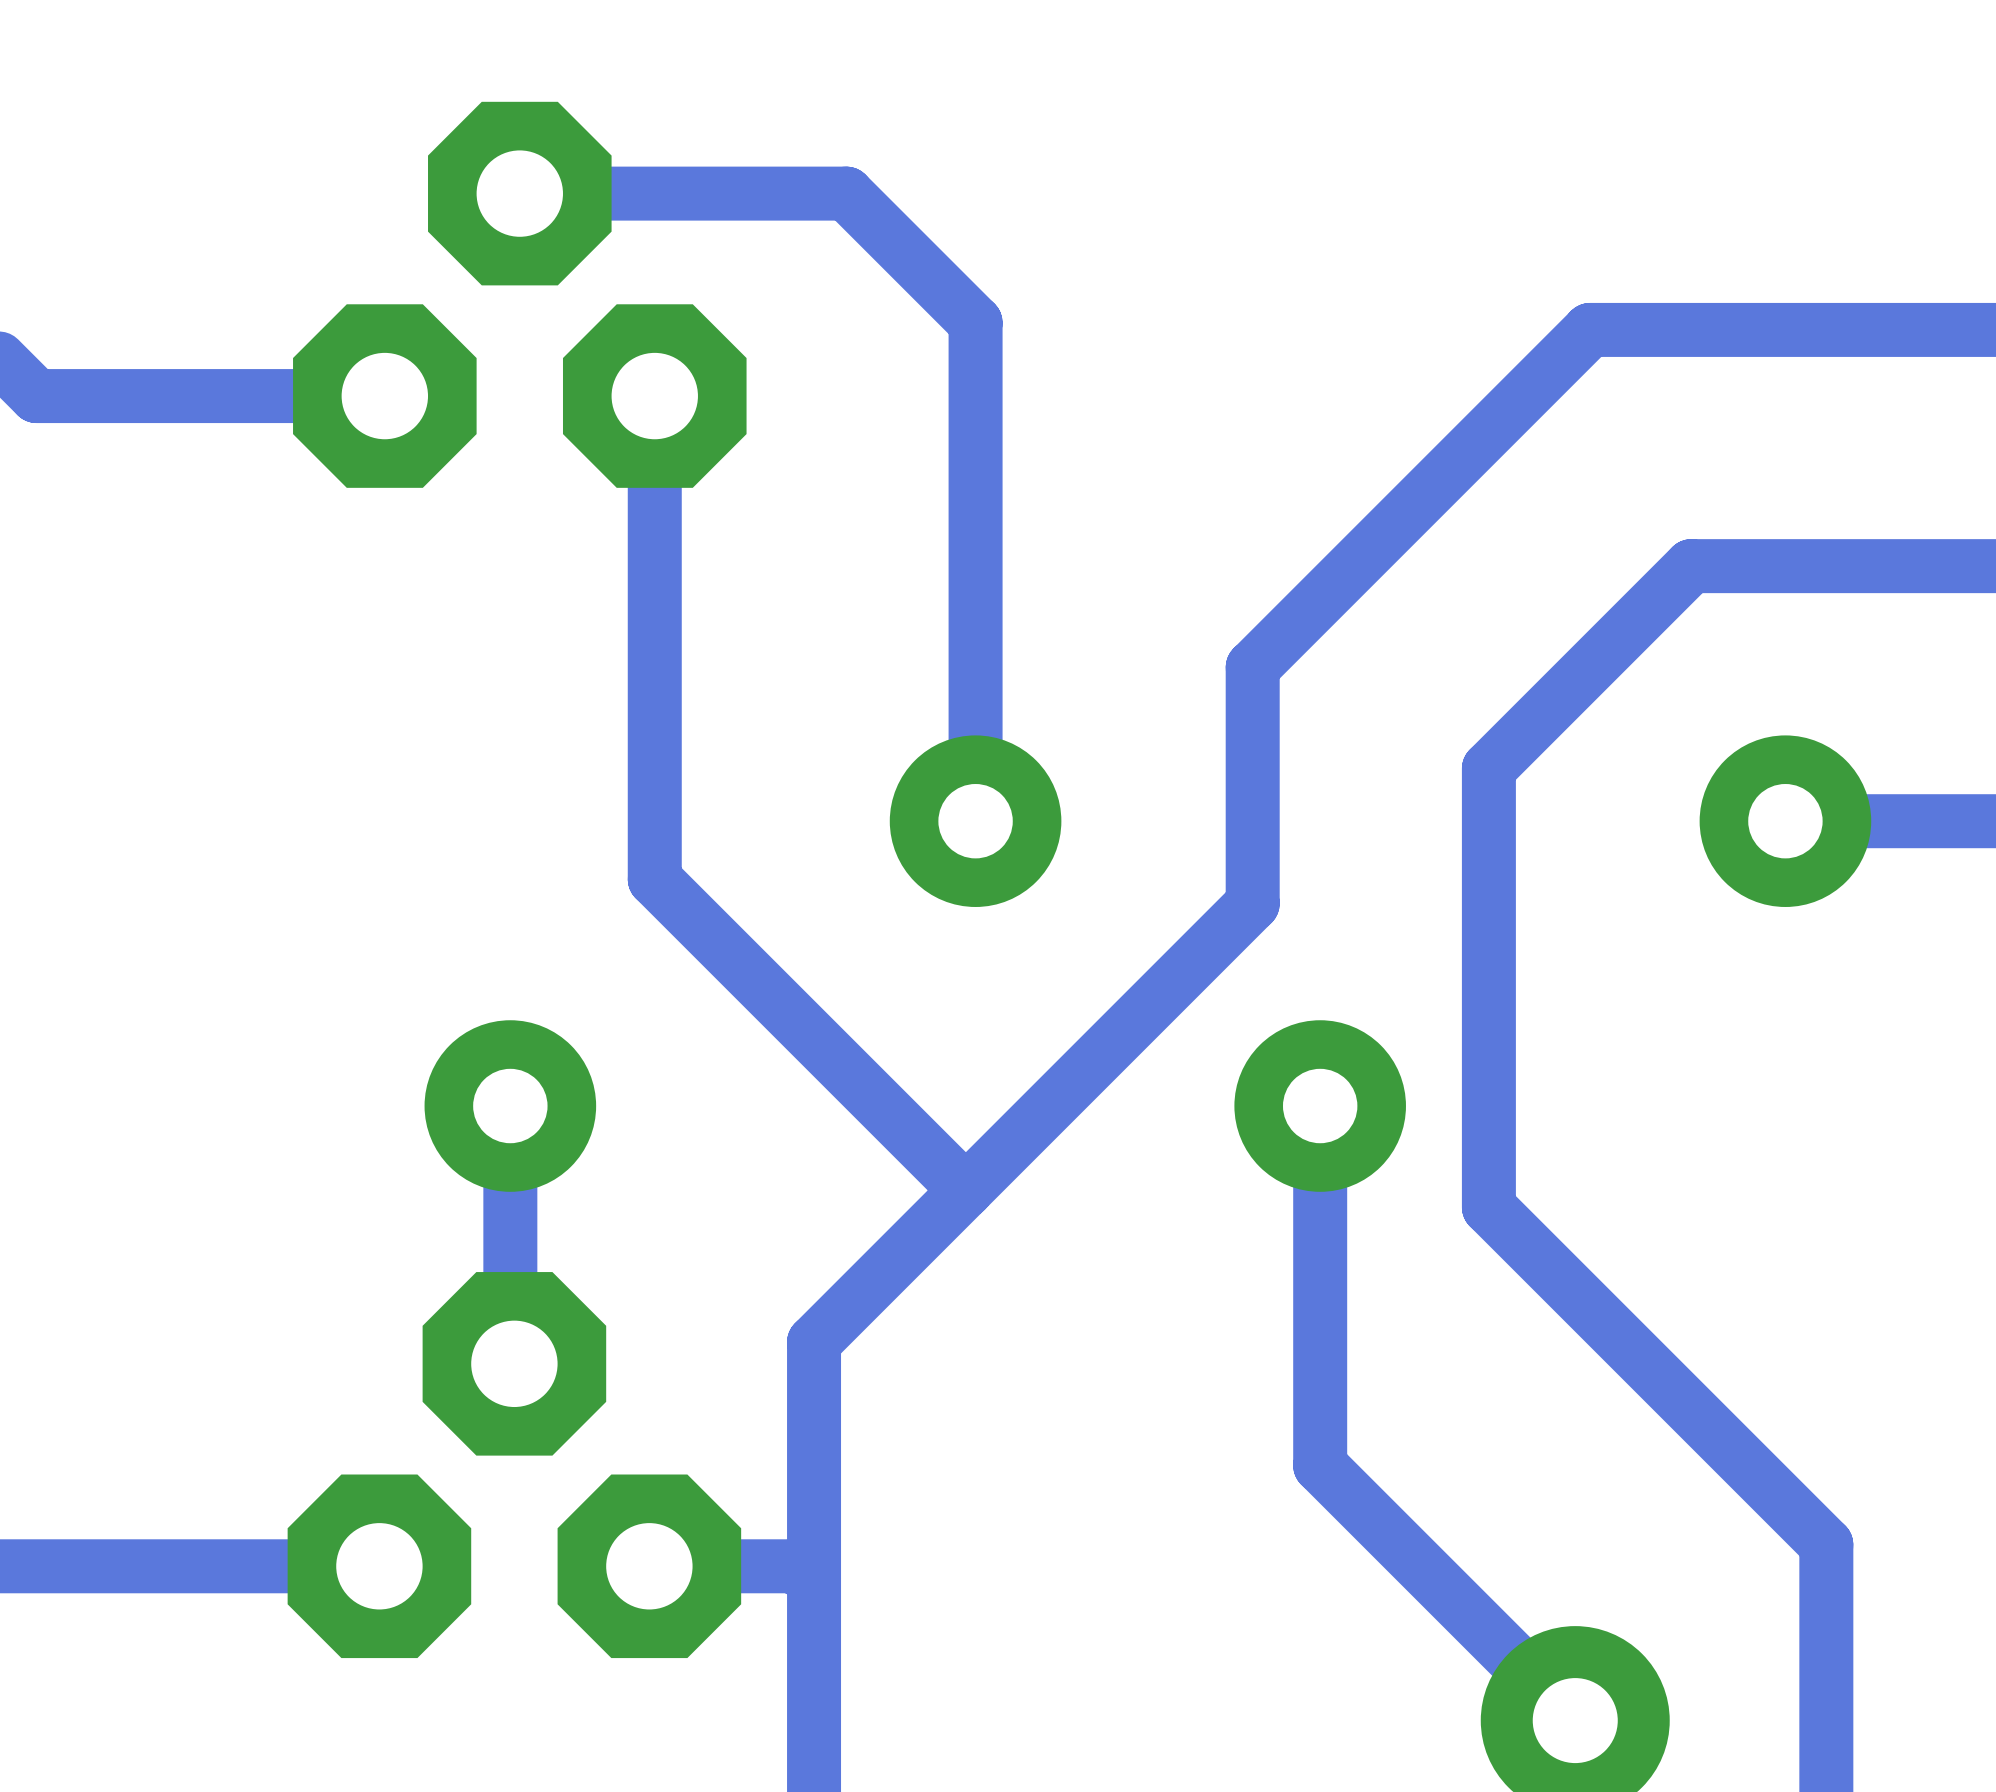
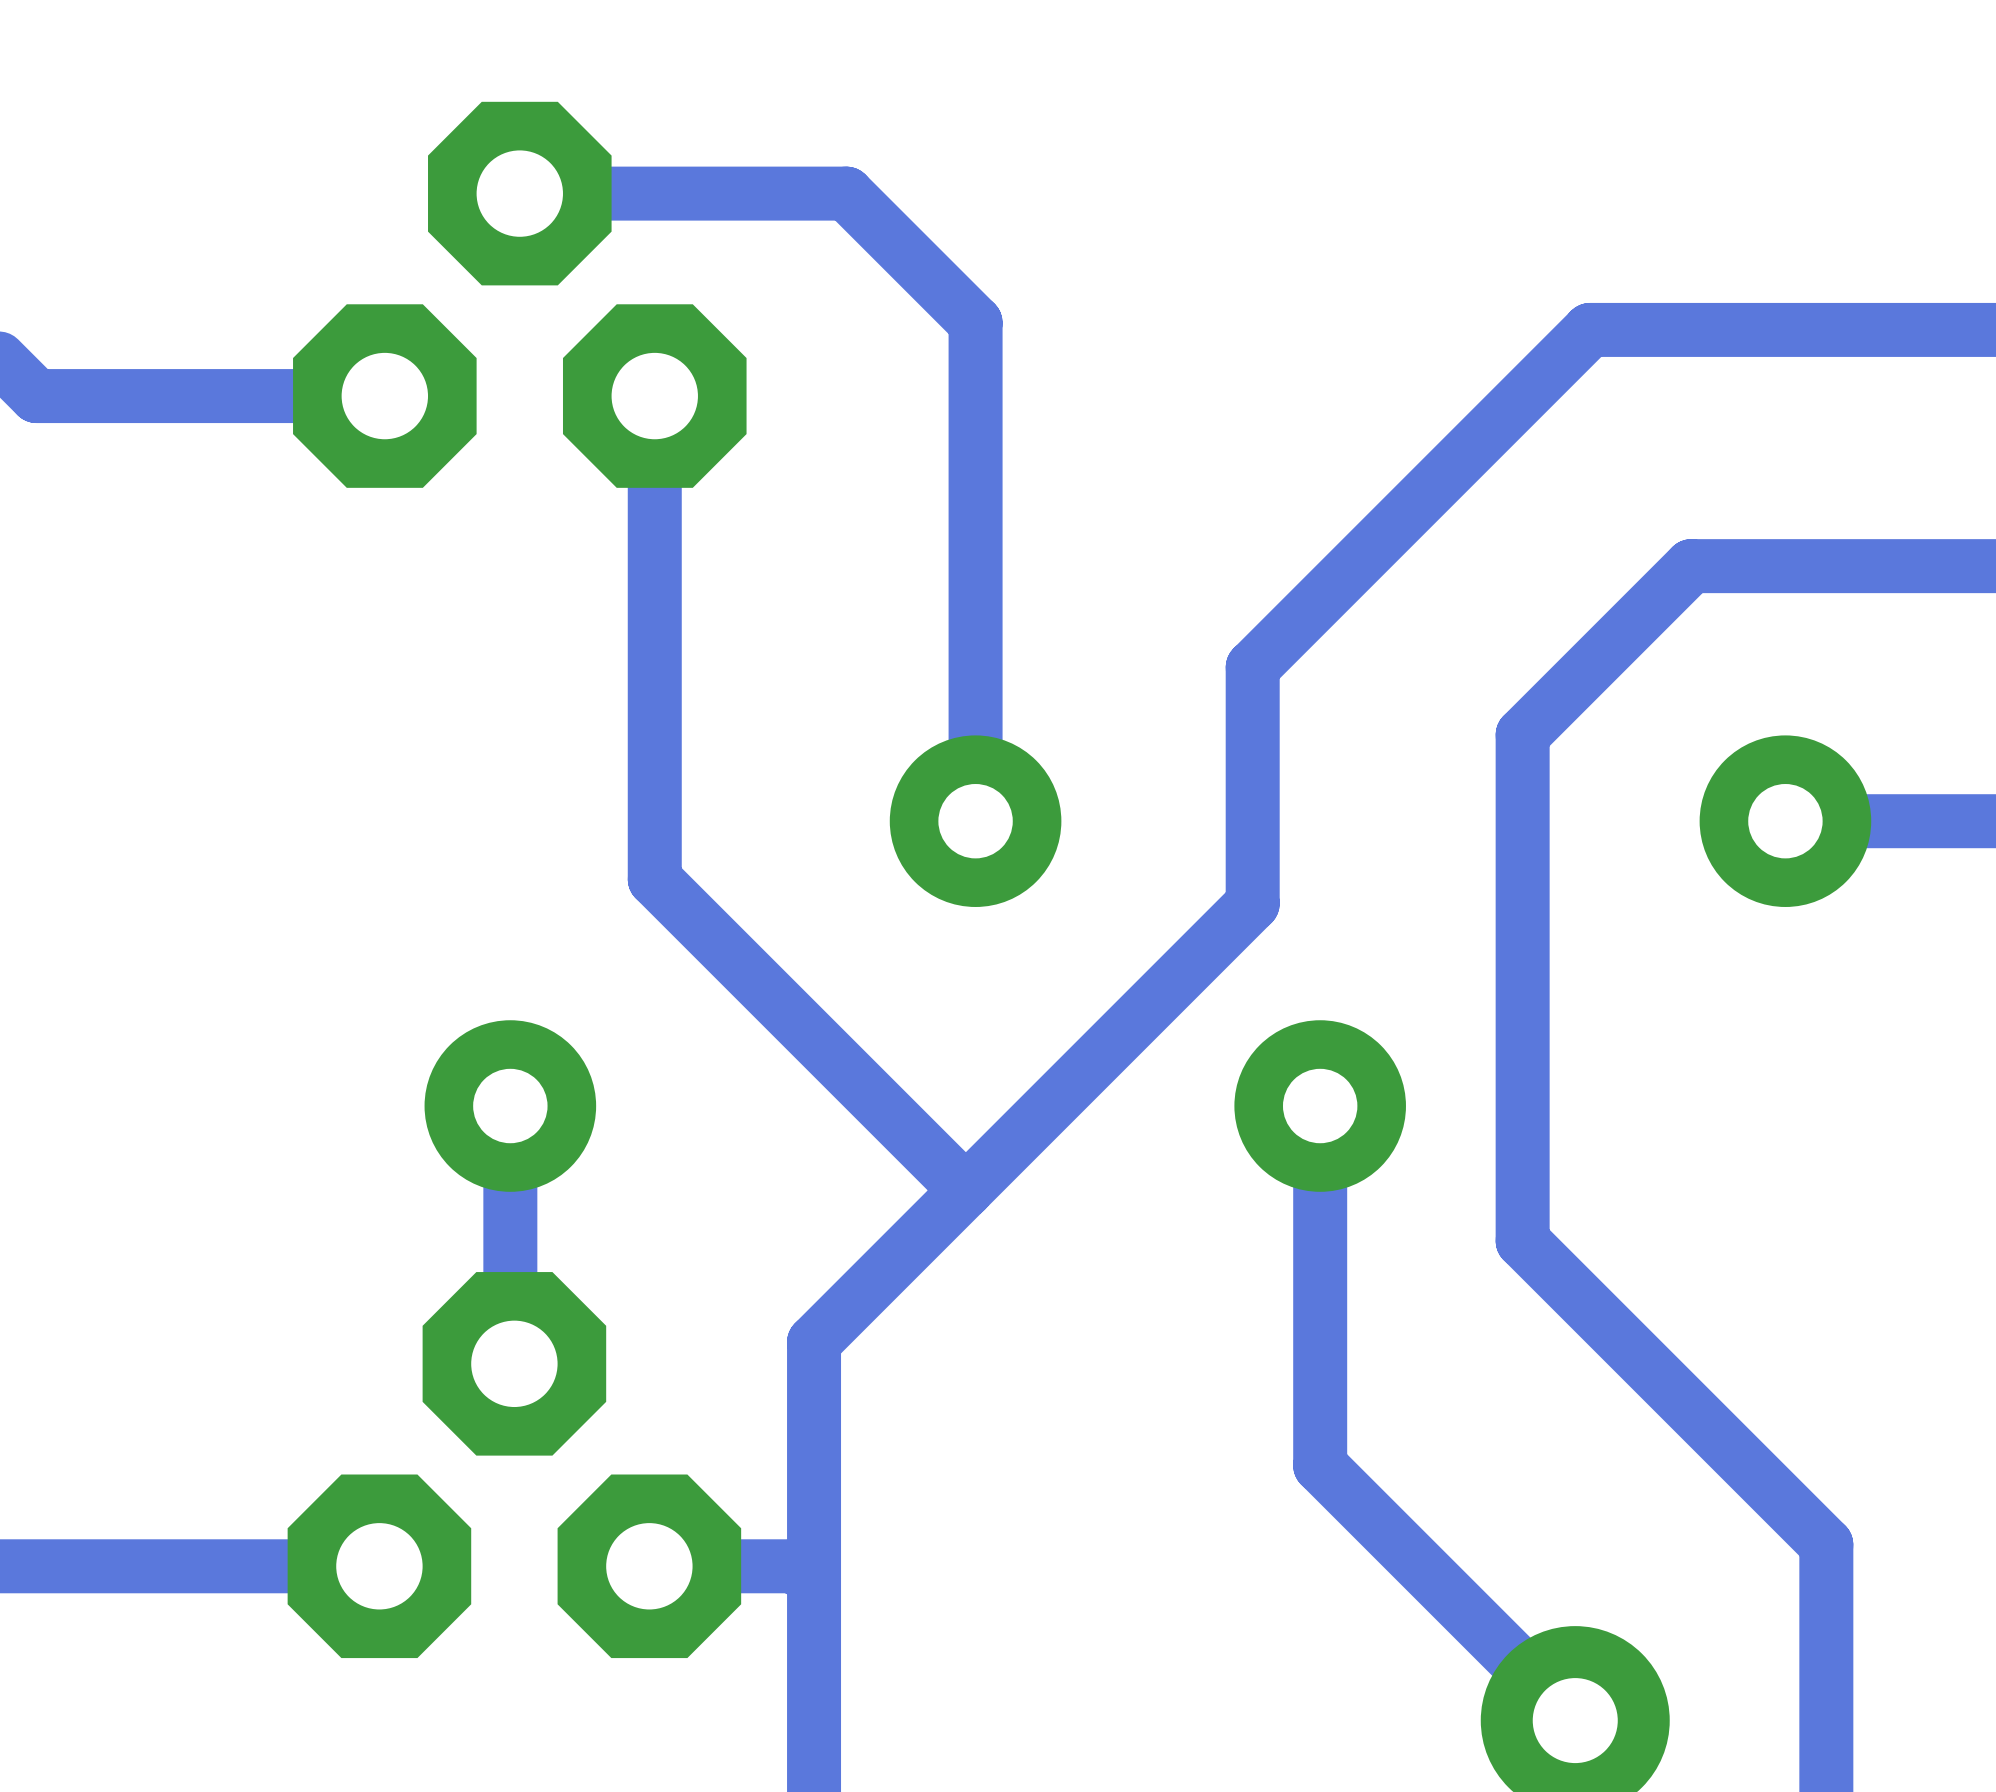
bottom track: (1522, 734) (1488, 768) (1488, 1207) (1522, 1241) -> (1522, 734) (1522, 1241)

